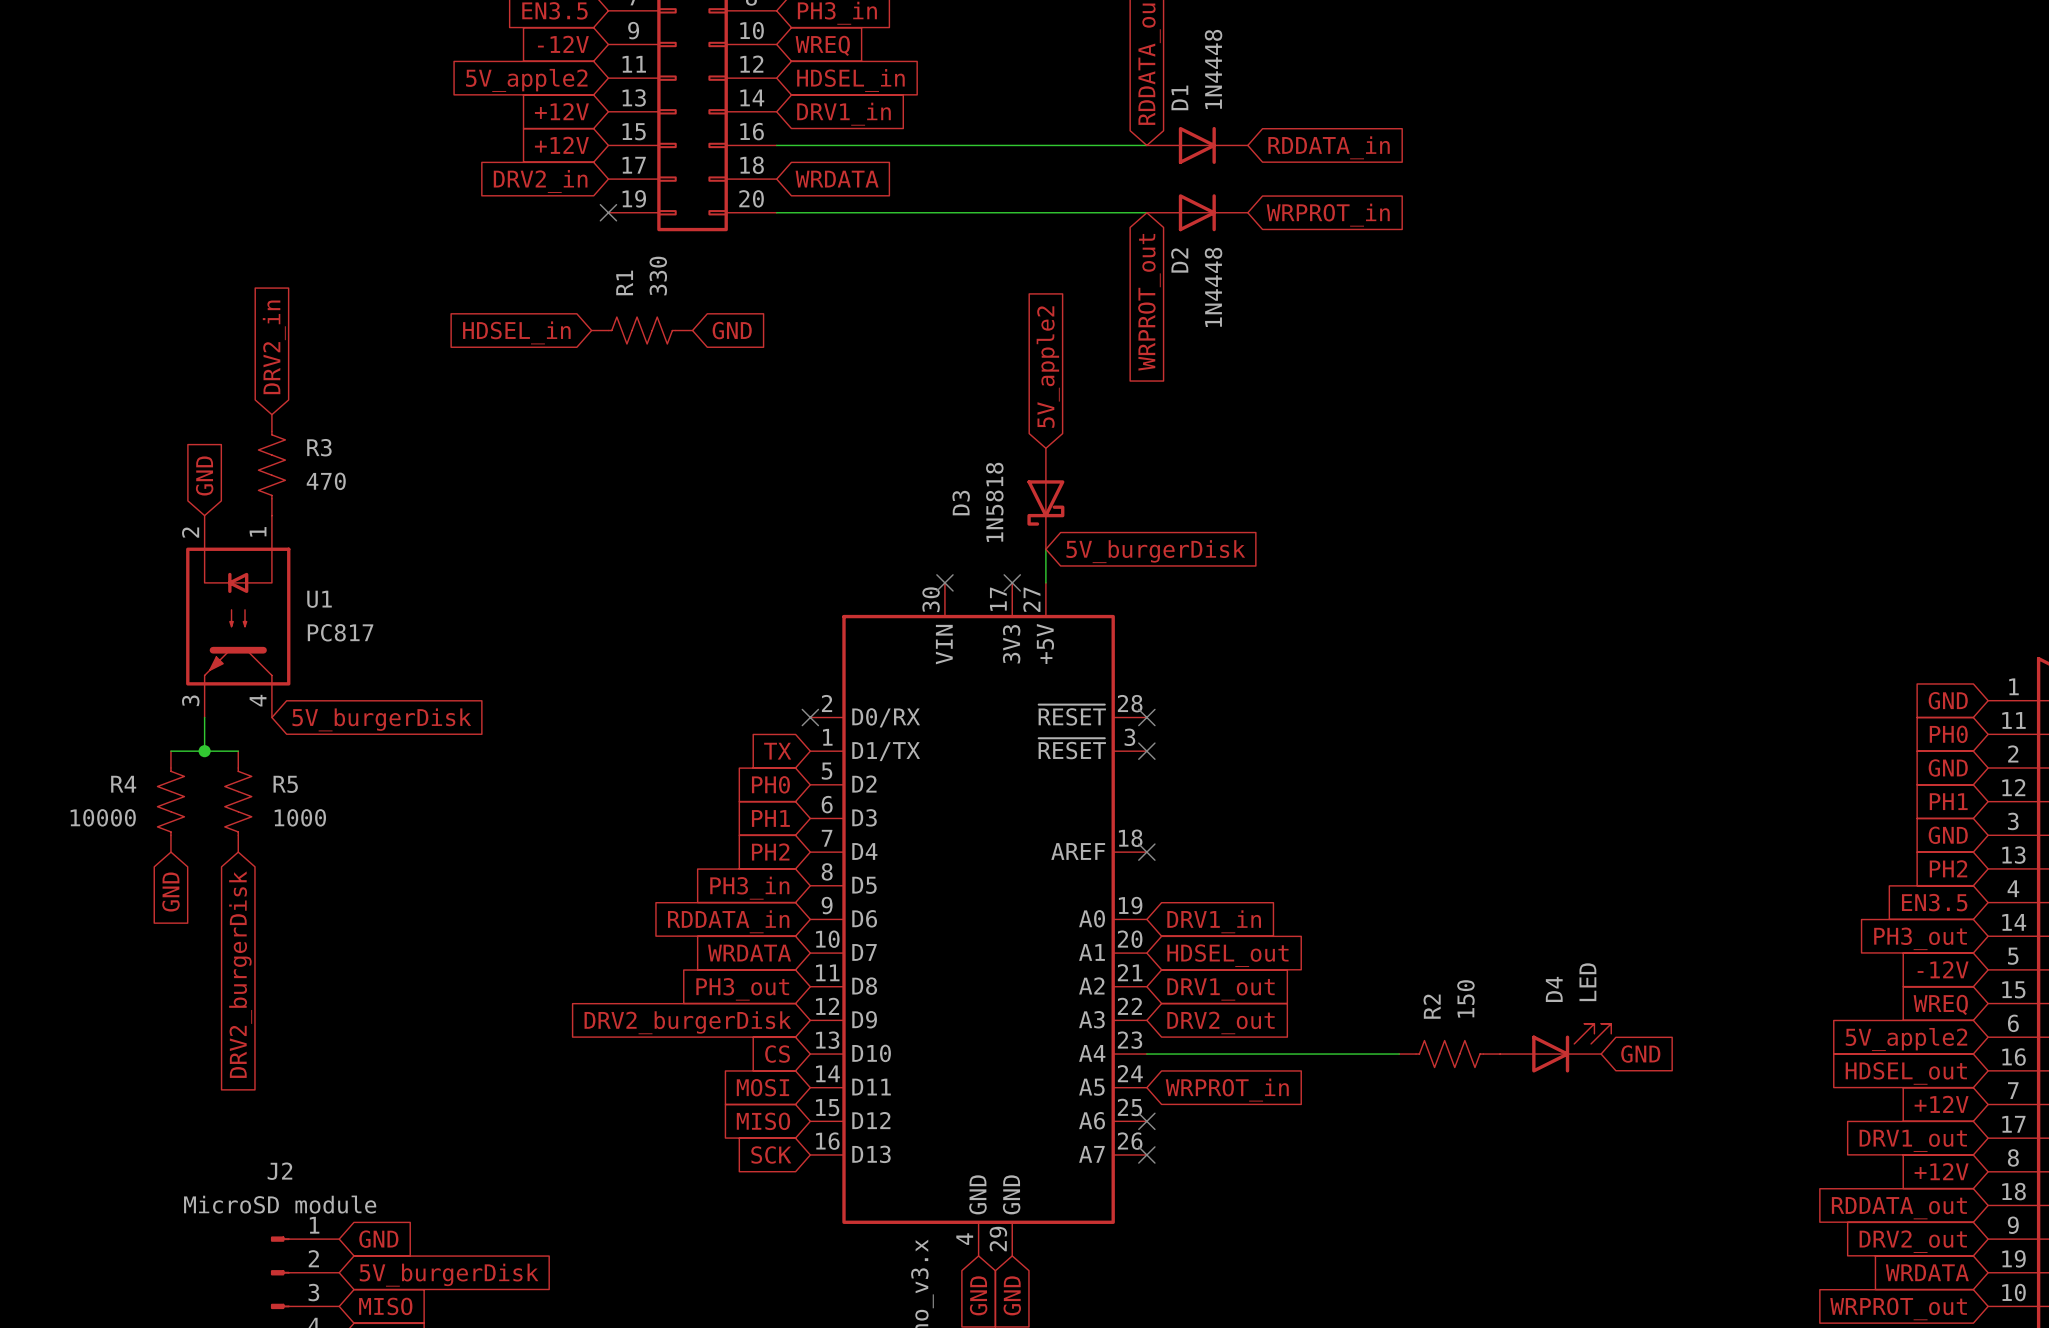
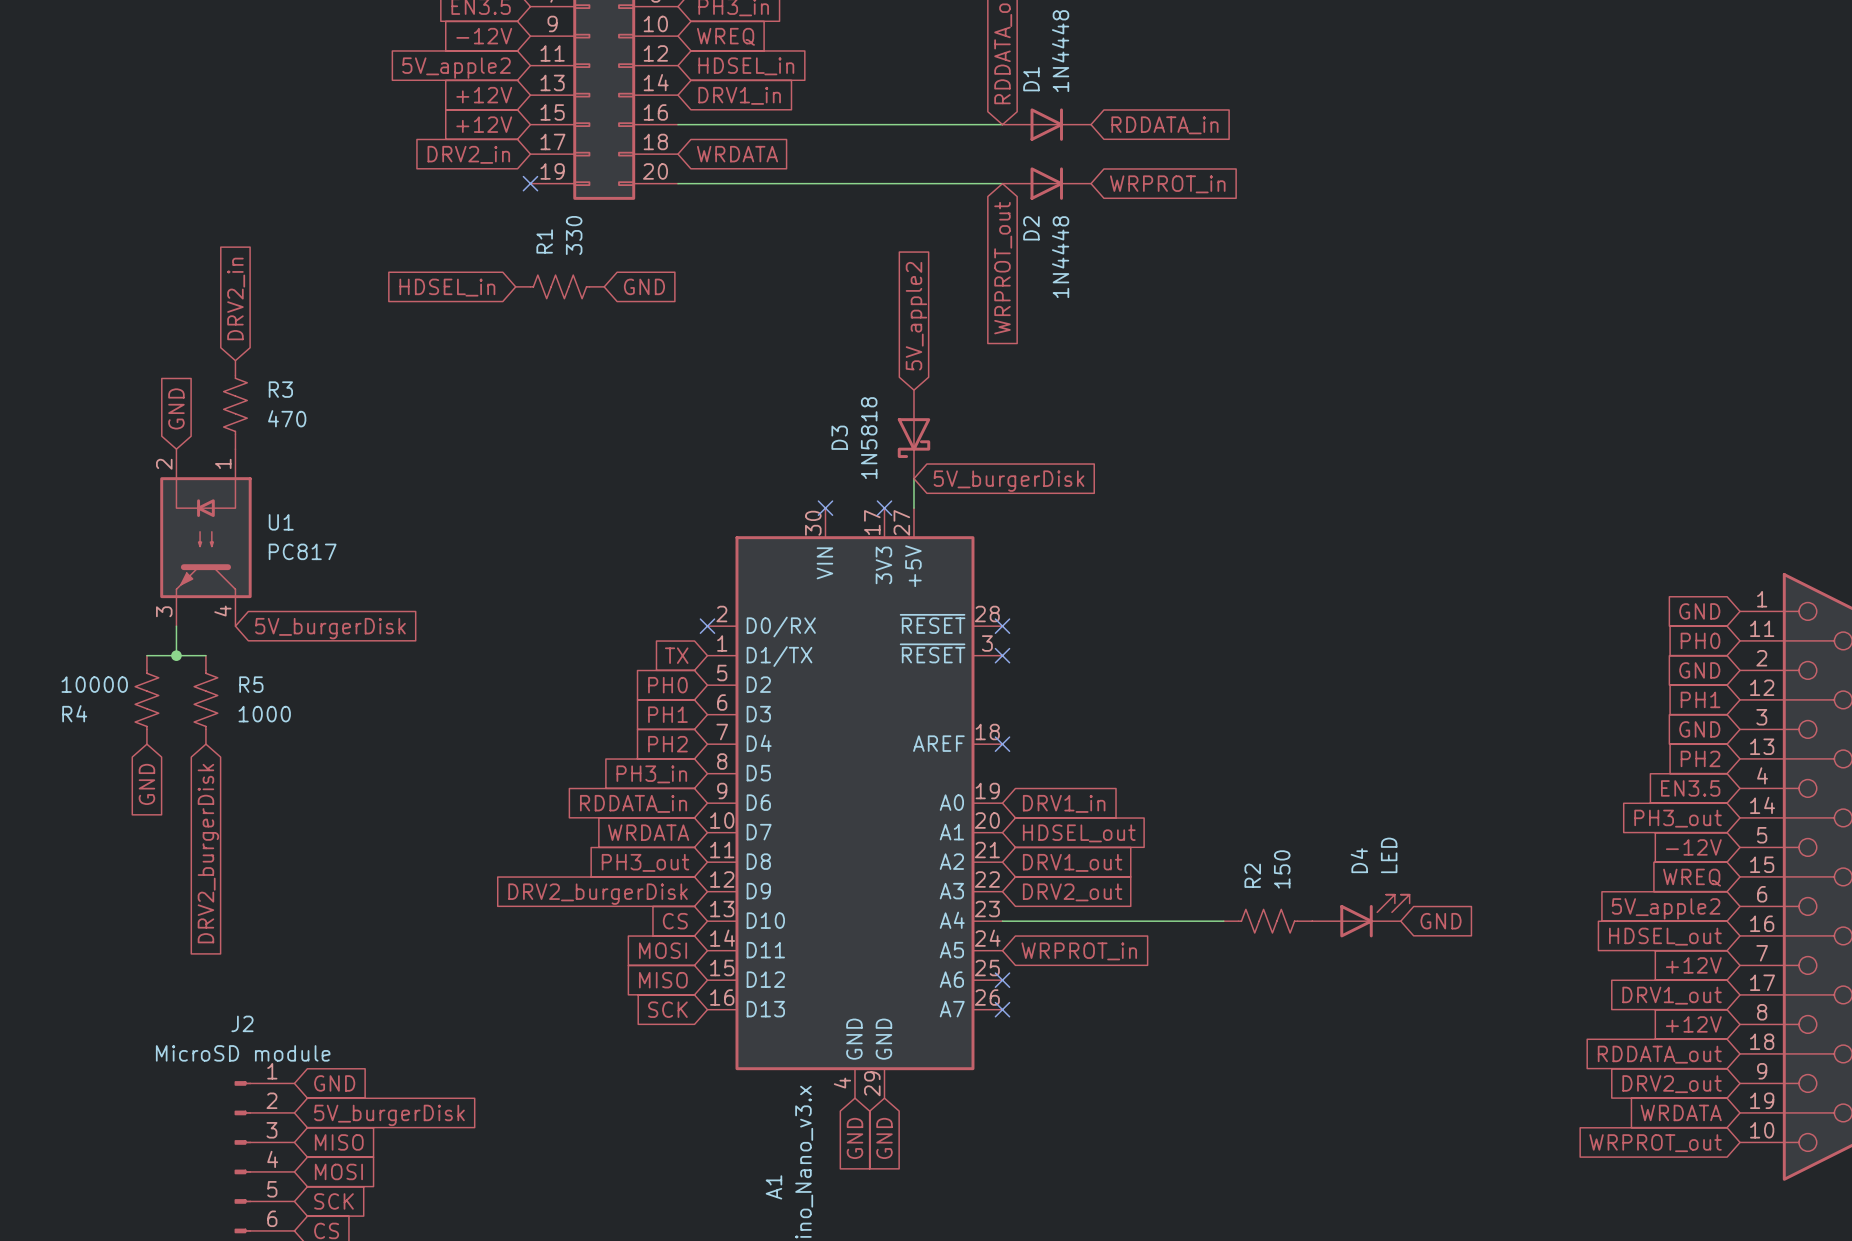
R4 name position: R4 (123, 784) -> R4 (74, 713)
R4 value position: 10000 (103, 817) -> 10000 (94, 684)

